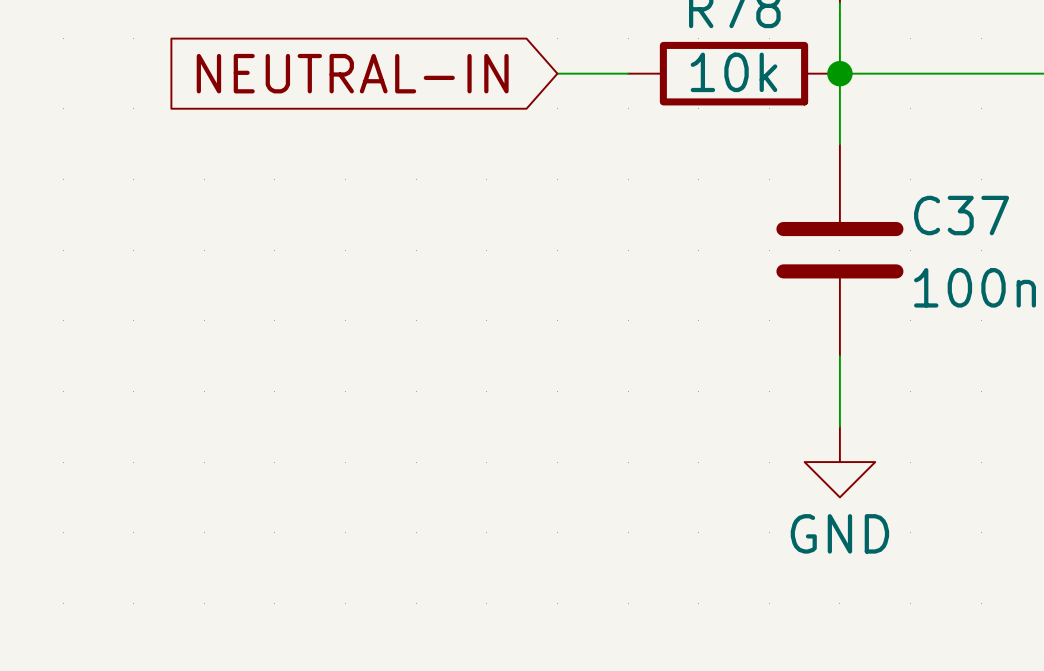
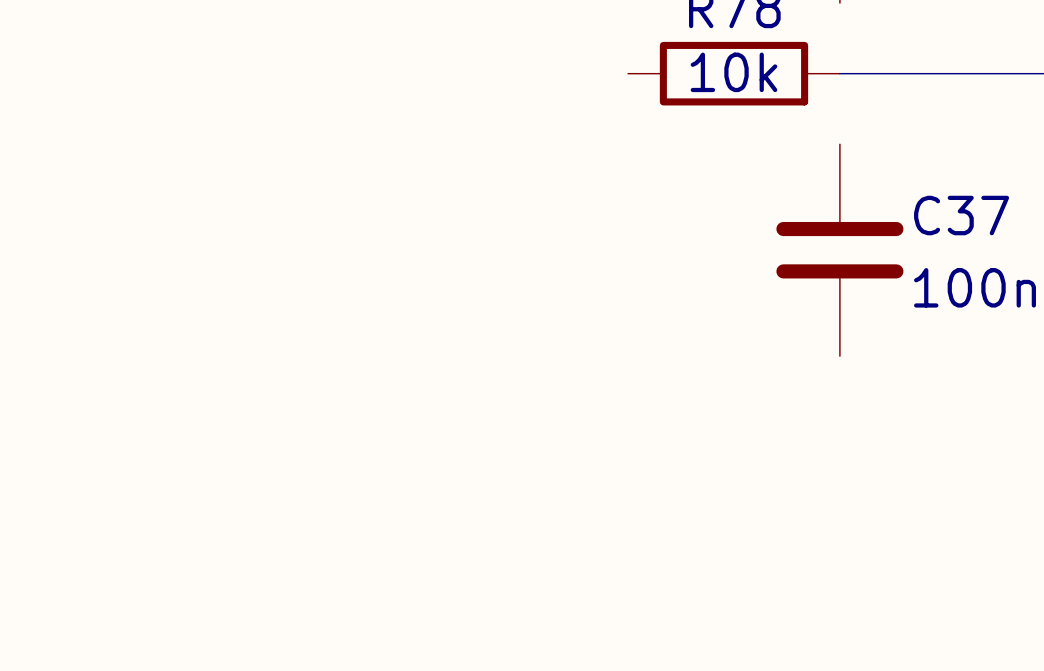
wire: (839, 3) (839, 144) -> none
global label: NEUTRAL-IN (352, 73) -> none
wire: (557, 73) (628, 73) -> none
junction: (839, 73) -> none
wire: (839, 356) (839, 426) -> none
power symbol: GND (839, 462) -> none

